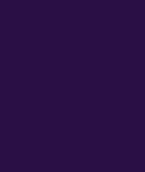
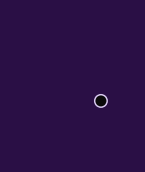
hole: none -> (100, 100)

